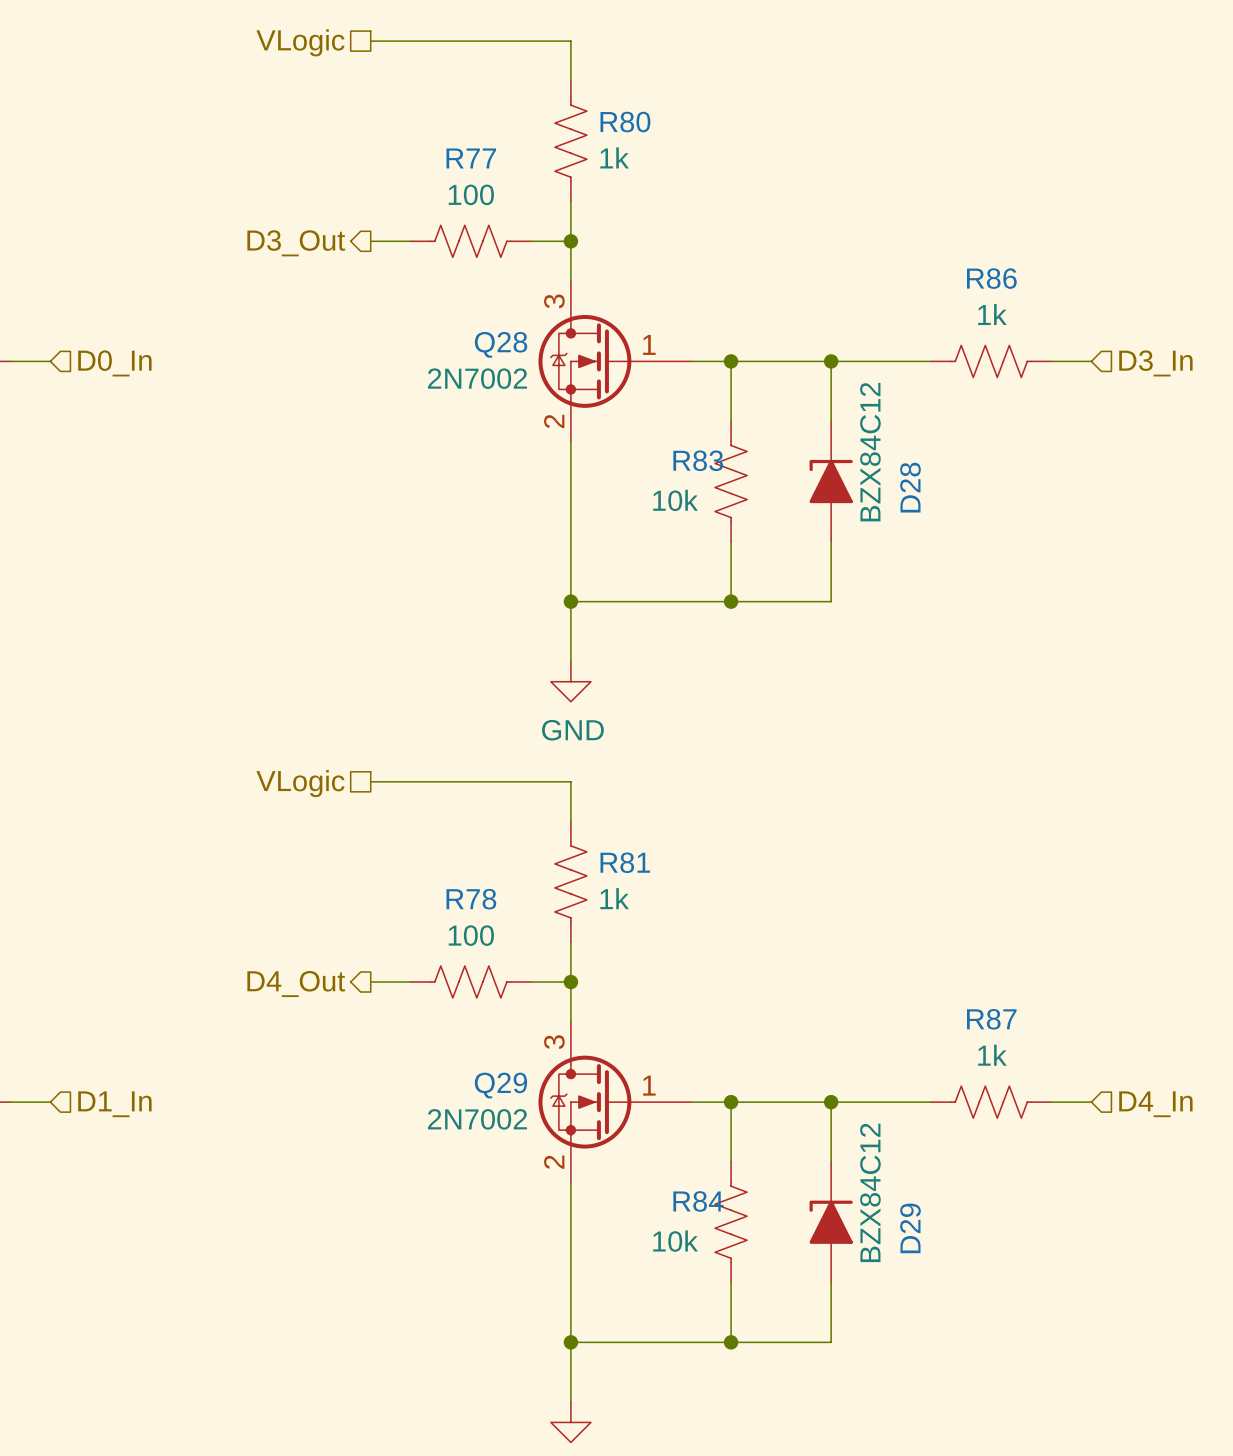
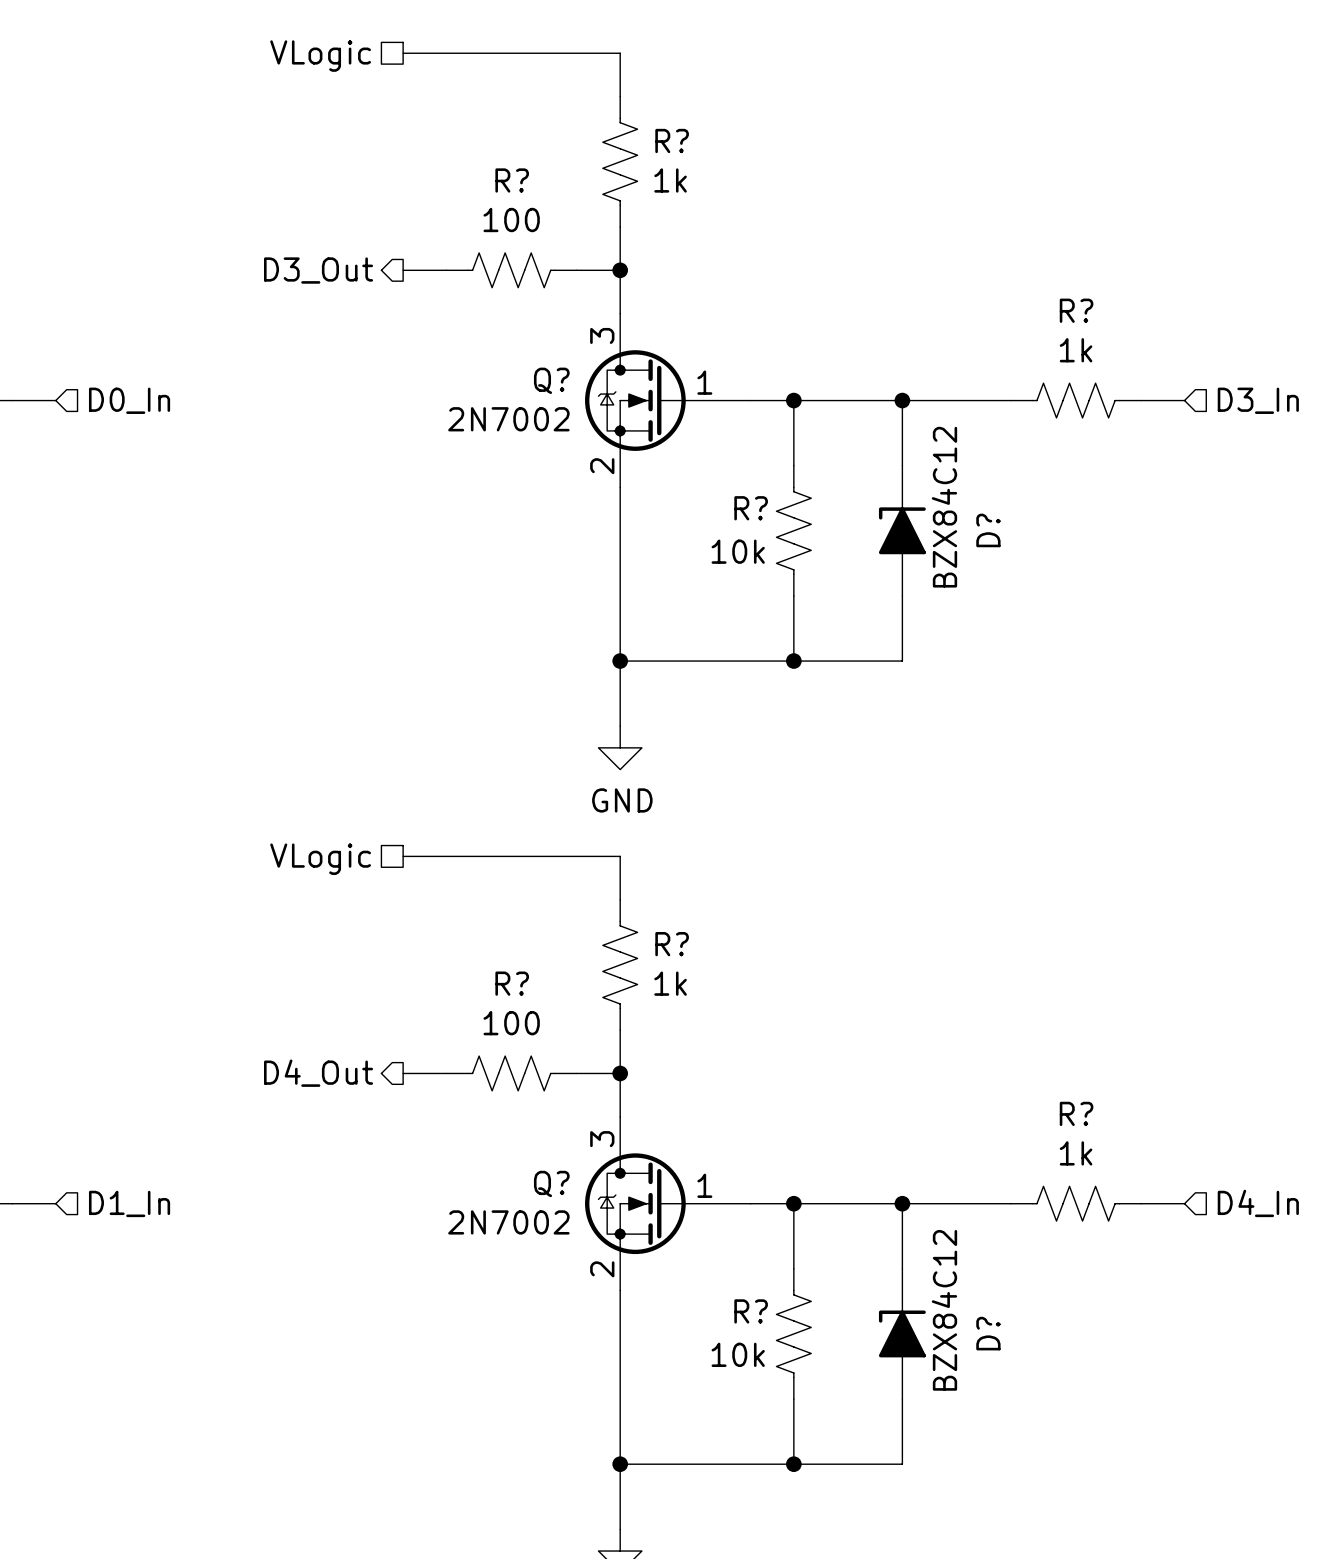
R80 name: R80 (625, 122) -> R? (672, 141)
R77 name: R77 (471, 158) -> R? (512, 180)
R86 name: R86 (991, 278) -> R? (1076, 310)
Q28 name: Q28 (501, 344) -> Q? (551, 380)
R83 name: R83 (698, 460) -> R? (751, 508)
D28 name: D28 (910, 487) -> D? (988, 530)
R81 name: R81 (625, 862) -> R? (672, 944)
R78 name: R78 (471, 899) -> R? (512, 983)
R87 name: R87 (991, 1019) -> R? (1076, 1113)
Q29 name: Q29 (500, 1085) -> Q? (551, 1183)
R84 name: R84 (698, 1201) -> R? (751, 1311)
D29 name: D29 (910, 1228) -> D? (988, 1333)

